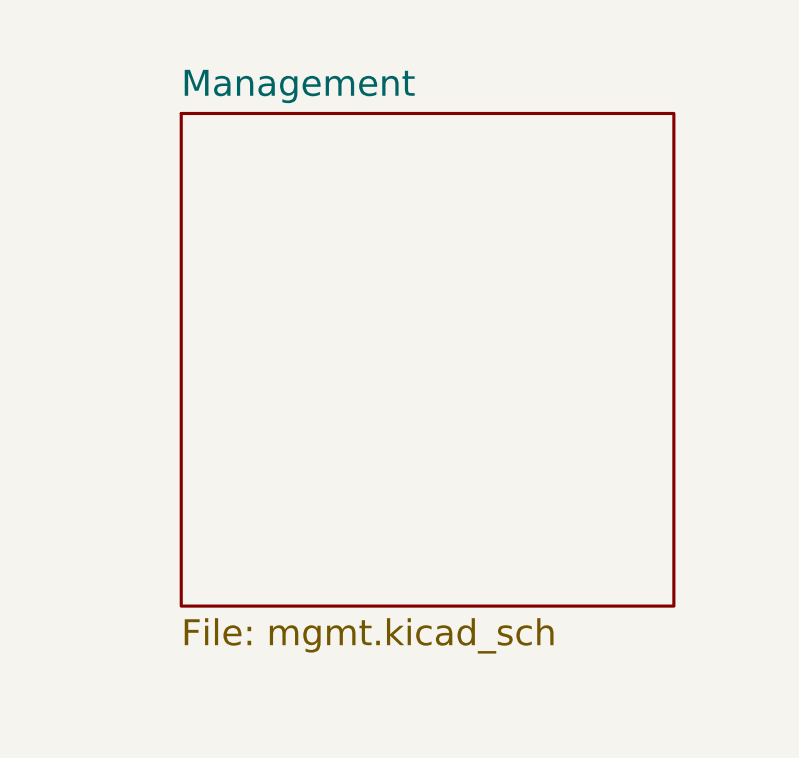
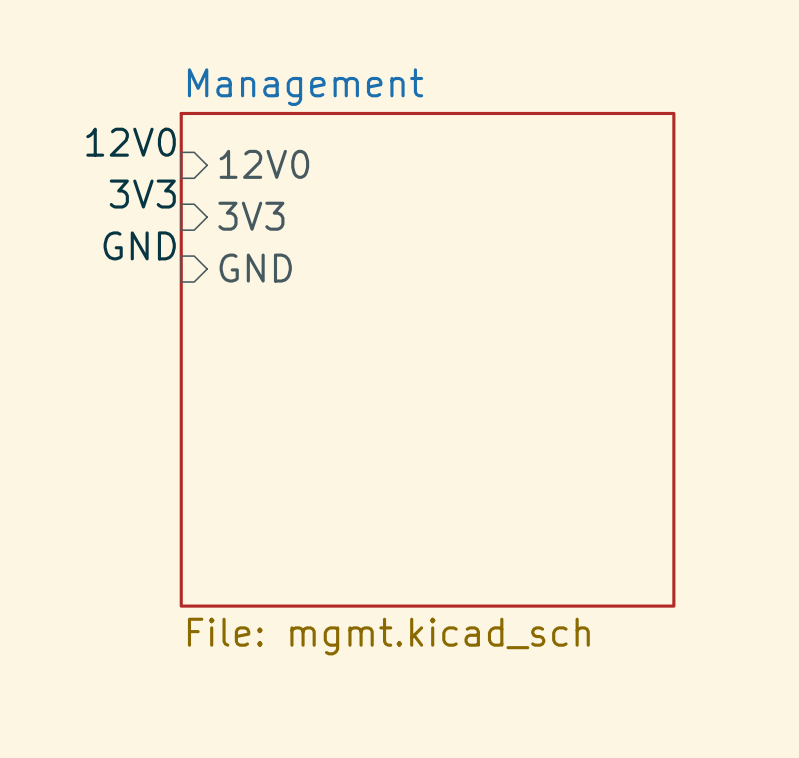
label: none -> 12V0 (131, 142)
sheet pin: none -> 12V0 (264, 164)
label: none -> 3V3 (142, 194)
sheet pin: none -> 3V3 (251, 216)
label: none -> GND (139, 245)
sheet pin: none -> GND (255, 268)

